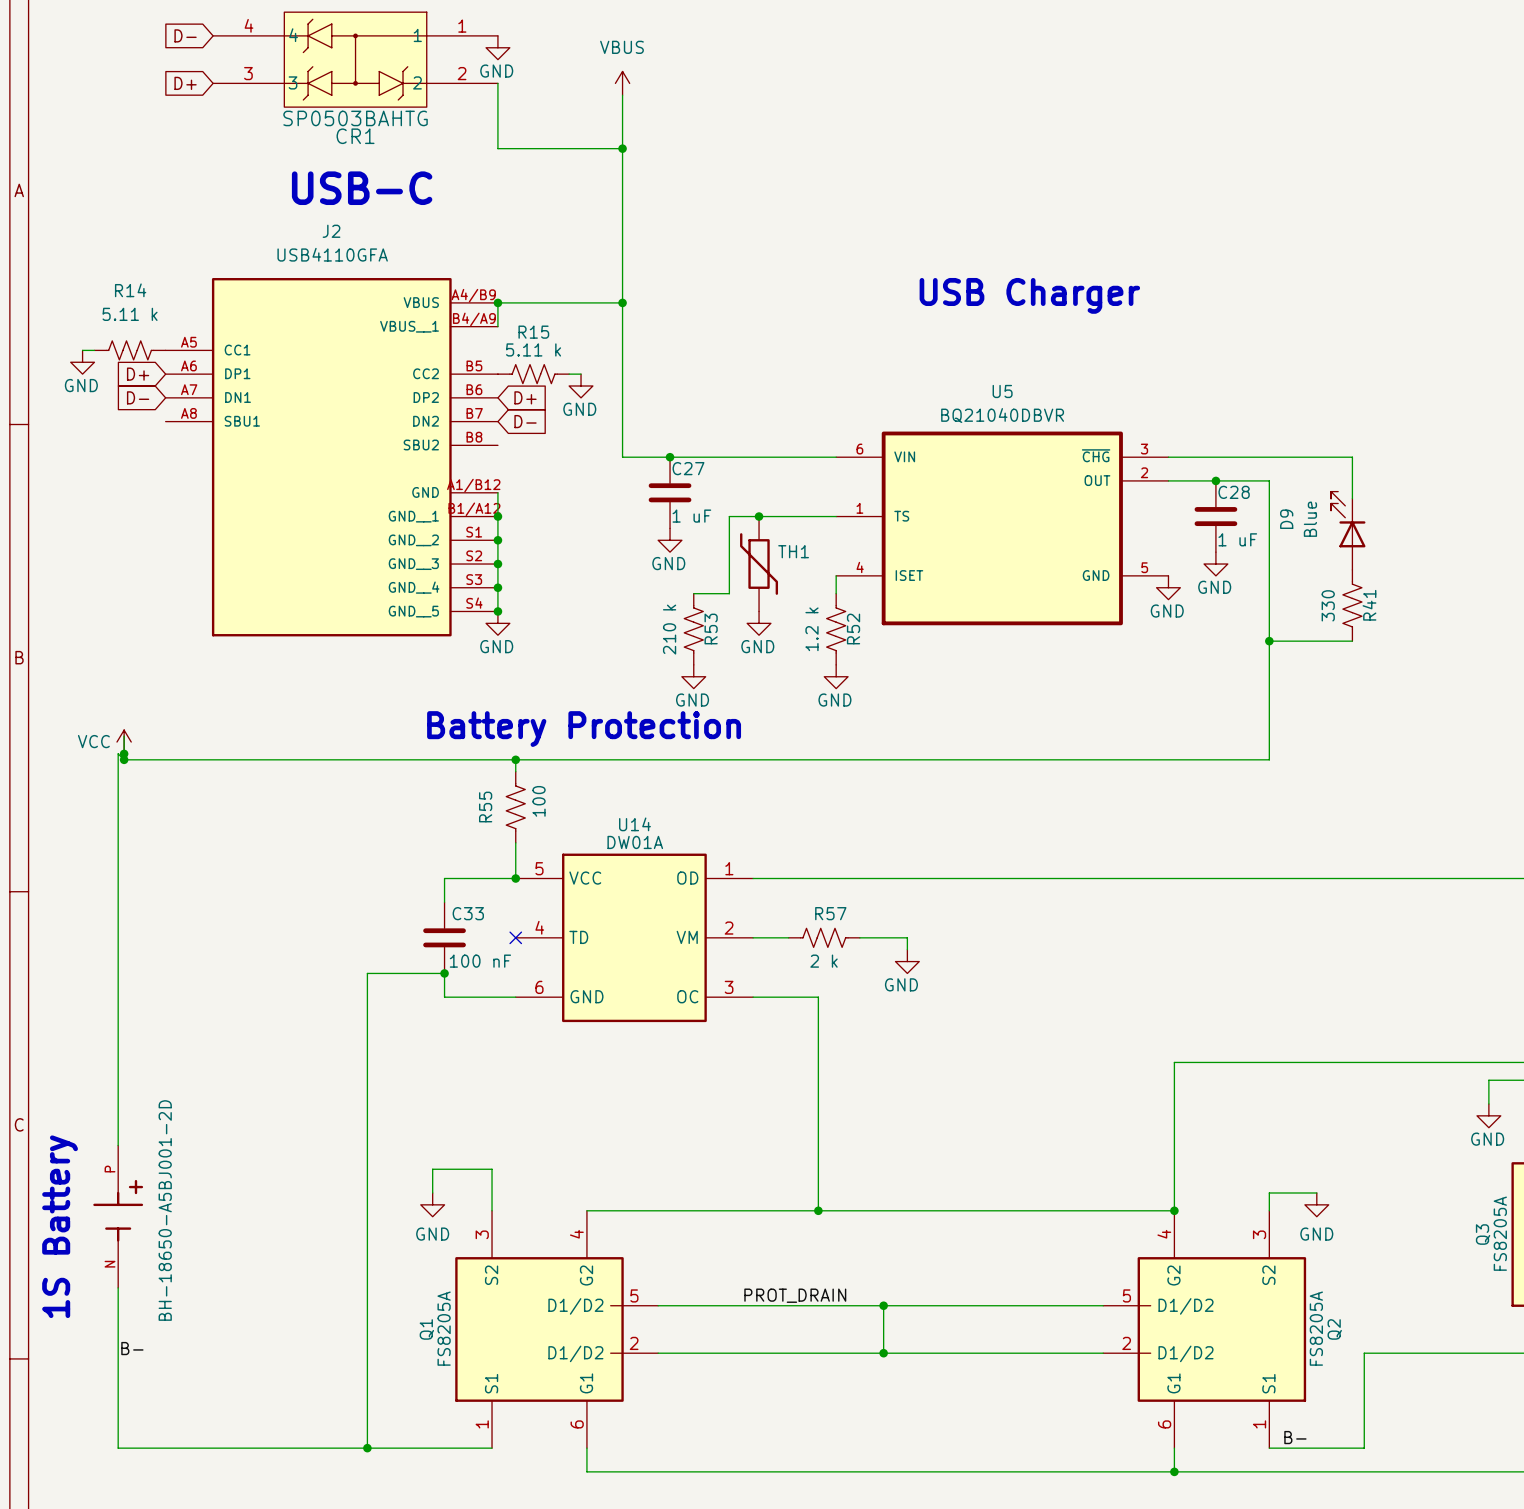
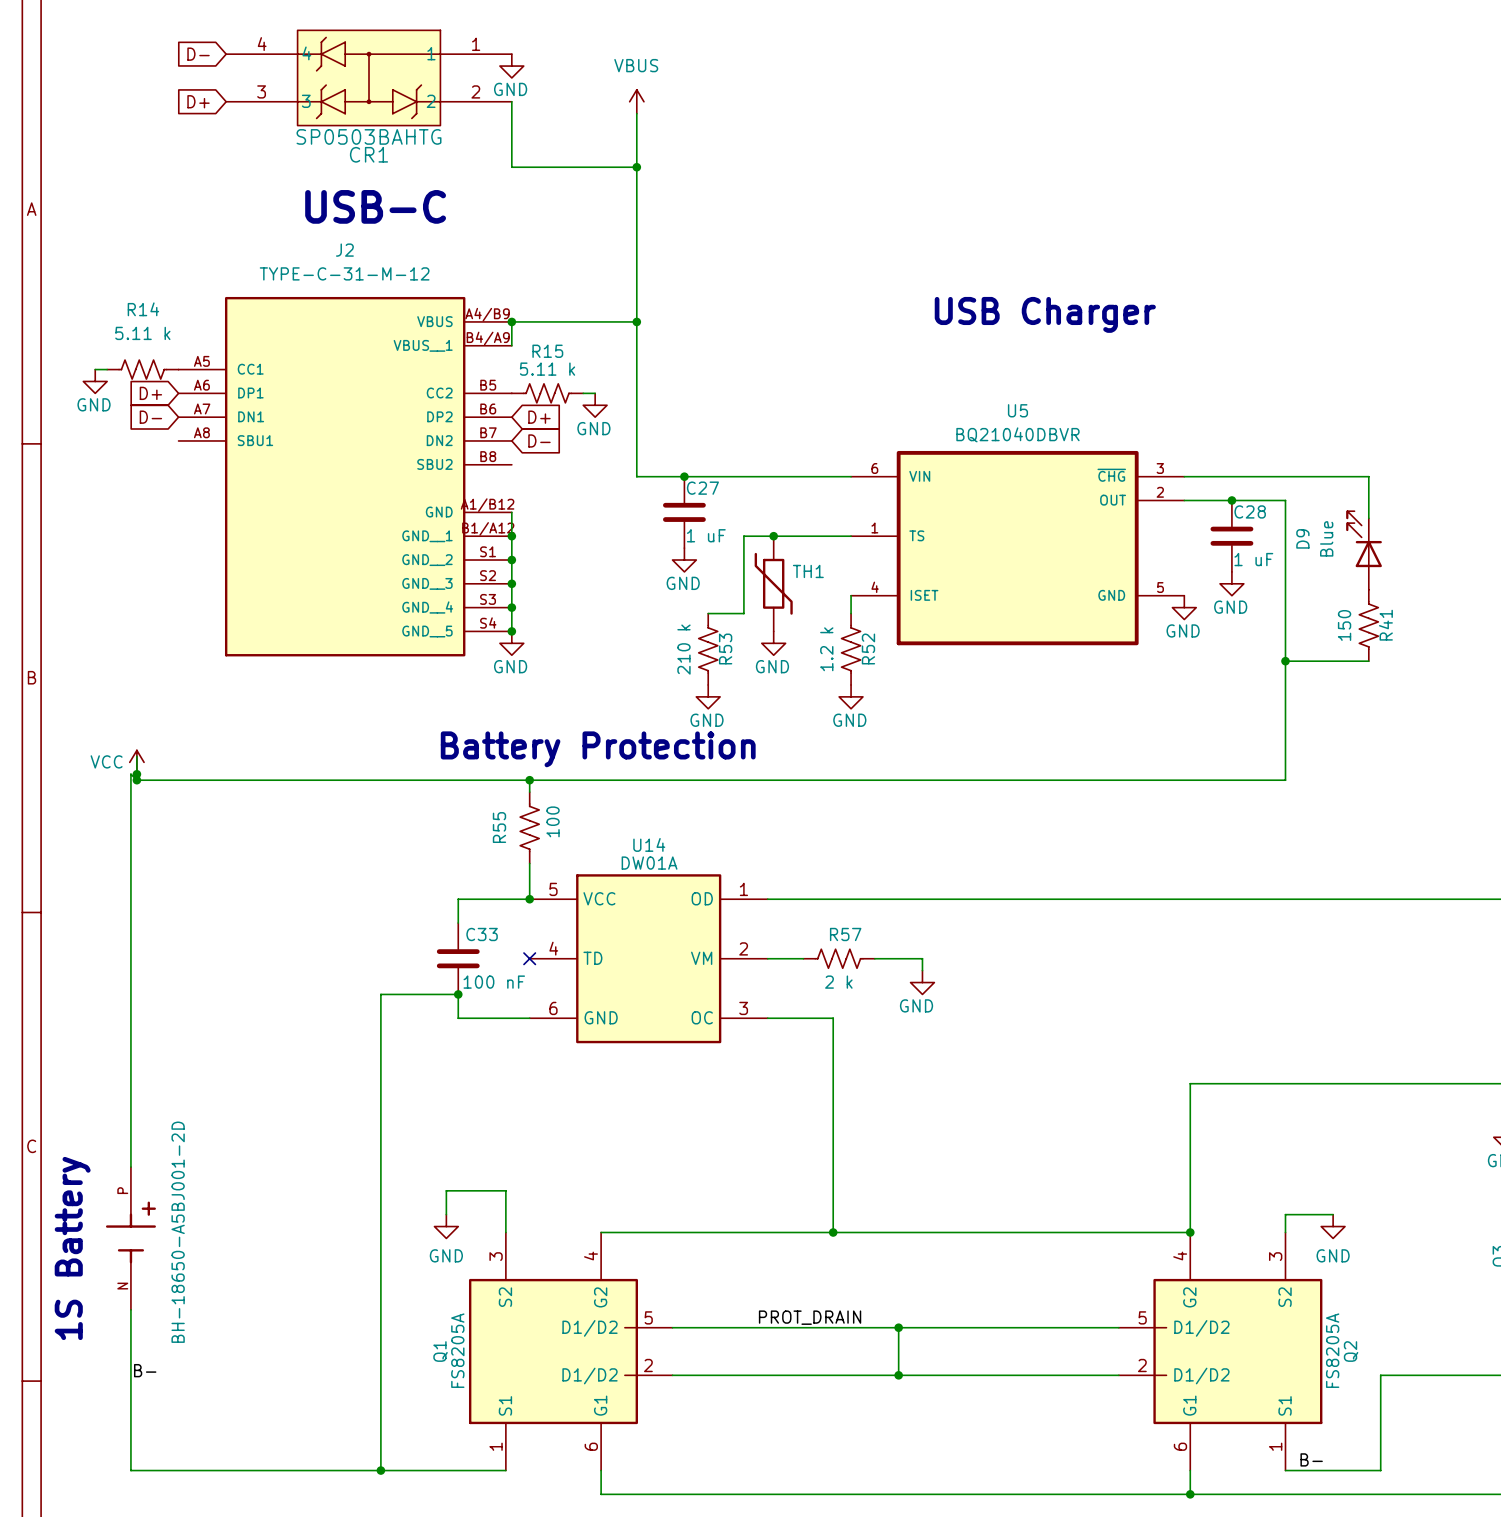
J2 value: USB4110GFA (332, 254) -> TYPE-C-31-M-12 (344, 273)
R41 value: 330 (1328, 605) -> 150 (1344, 625)

